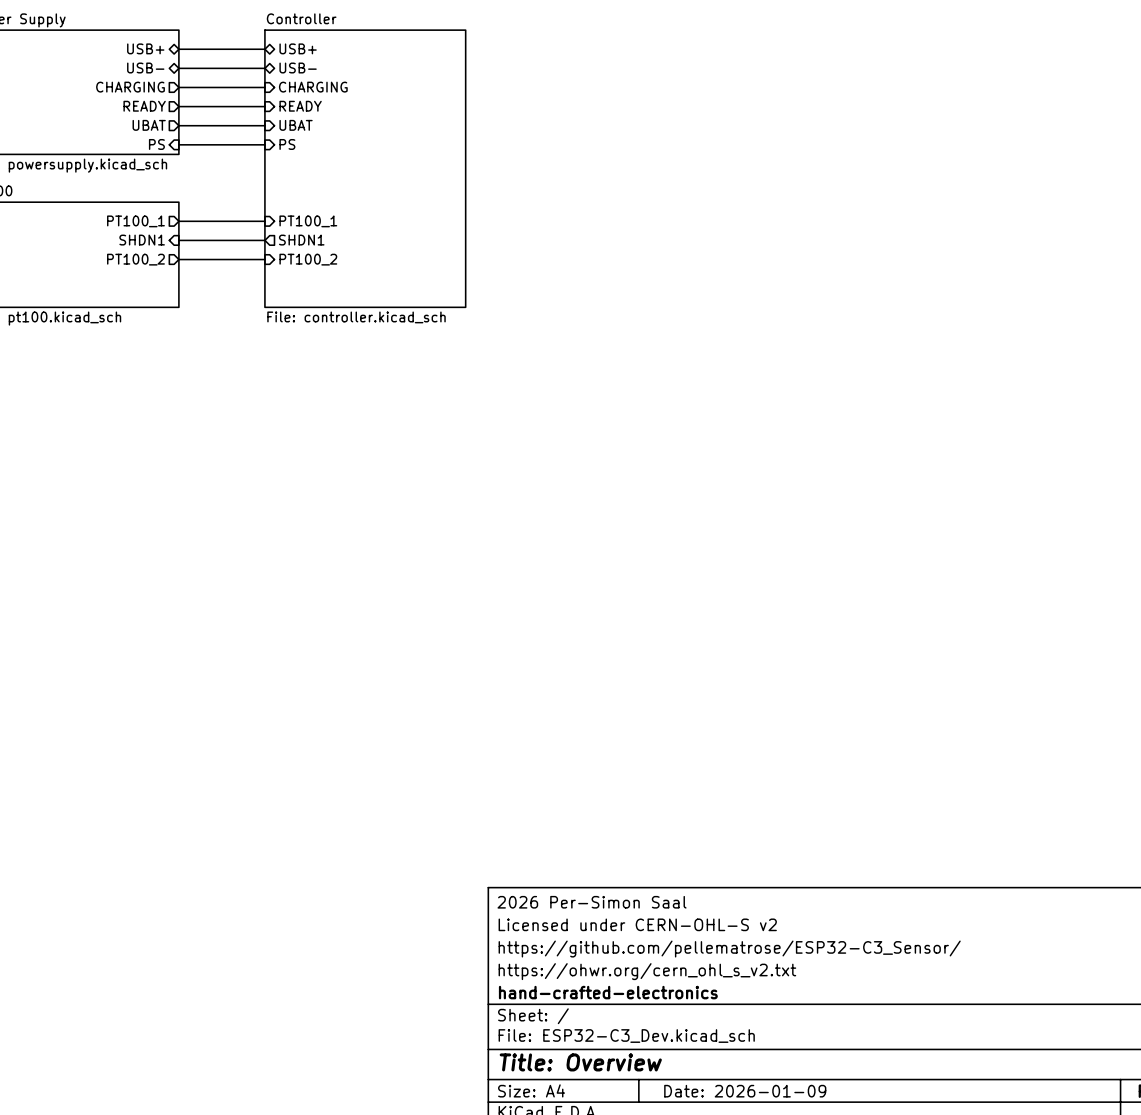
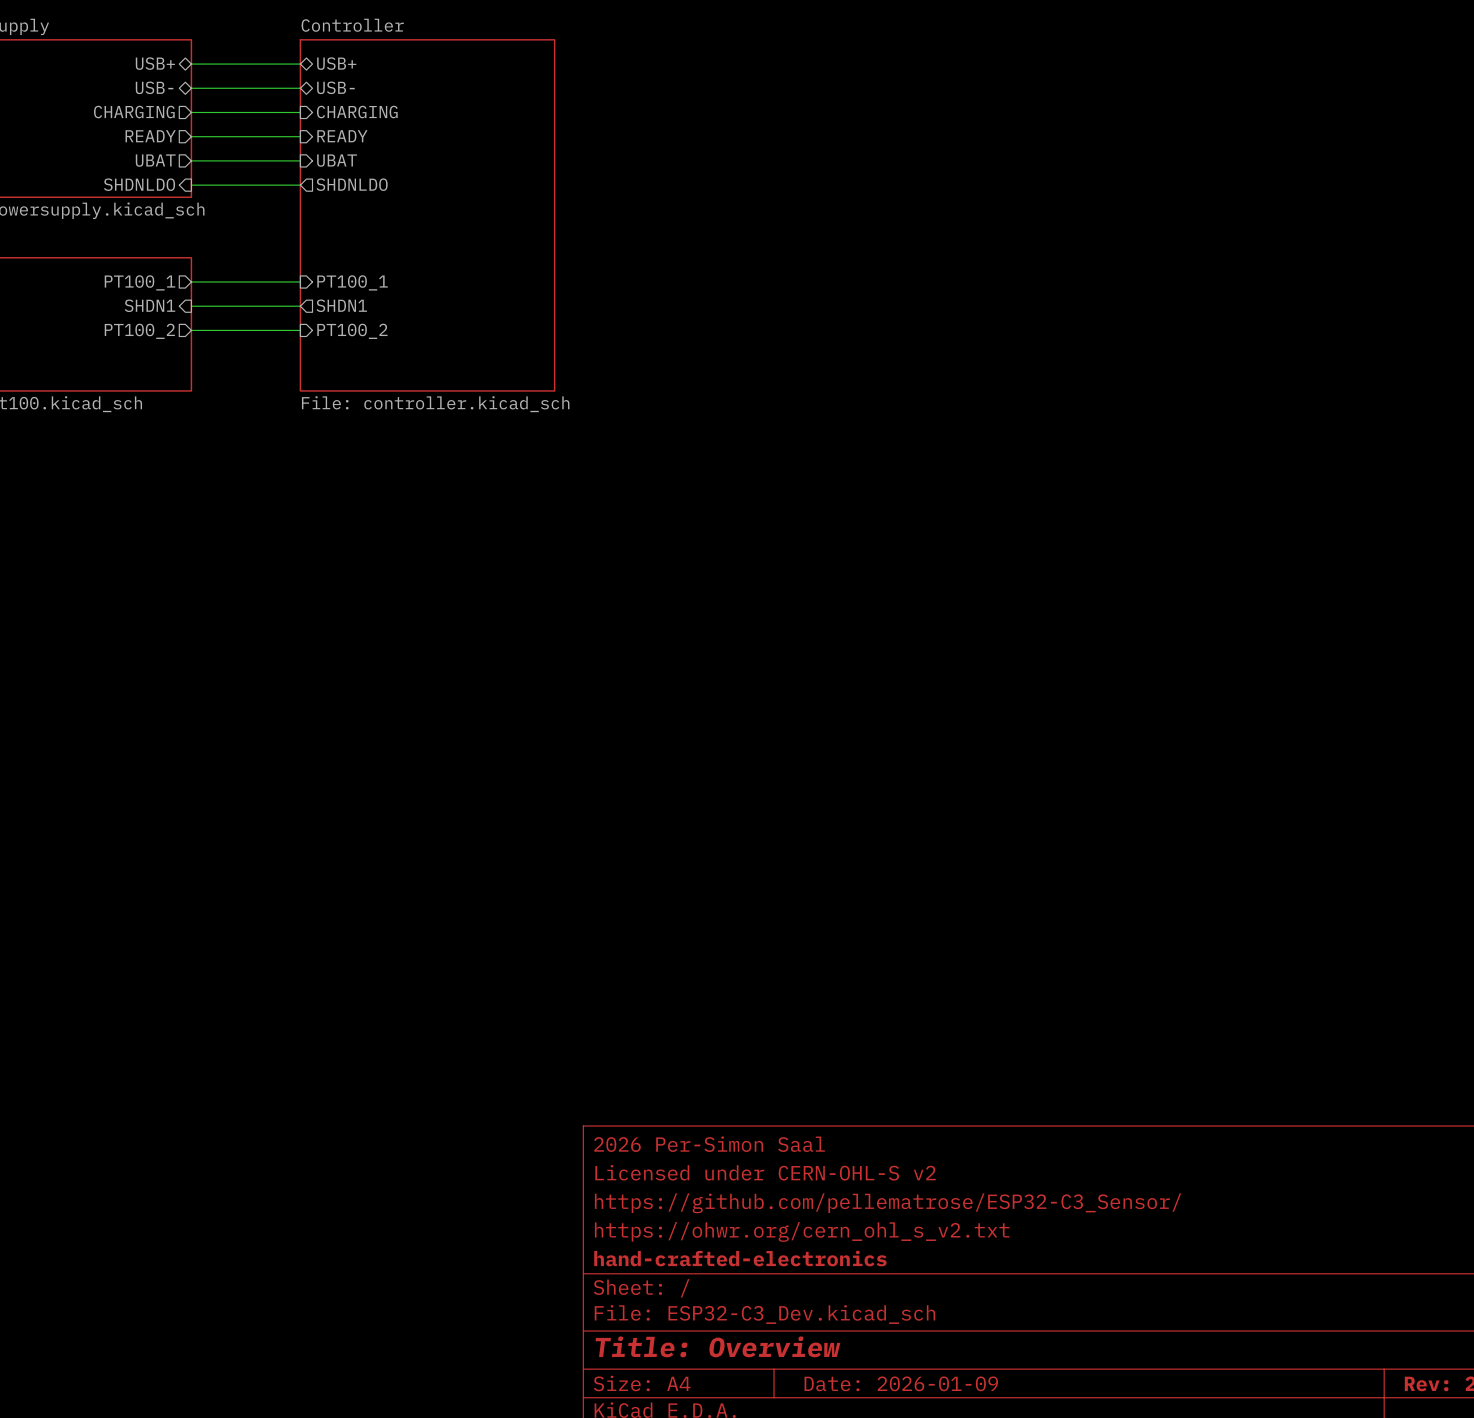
sheet pin: PS (156, 144) -> SHDNLDO (139, 184)
sheet pin shape: input (287, 144) -> output (352, 184)
sheet pin: PS (287, 144) -> SHDNLDO (352, 184)

